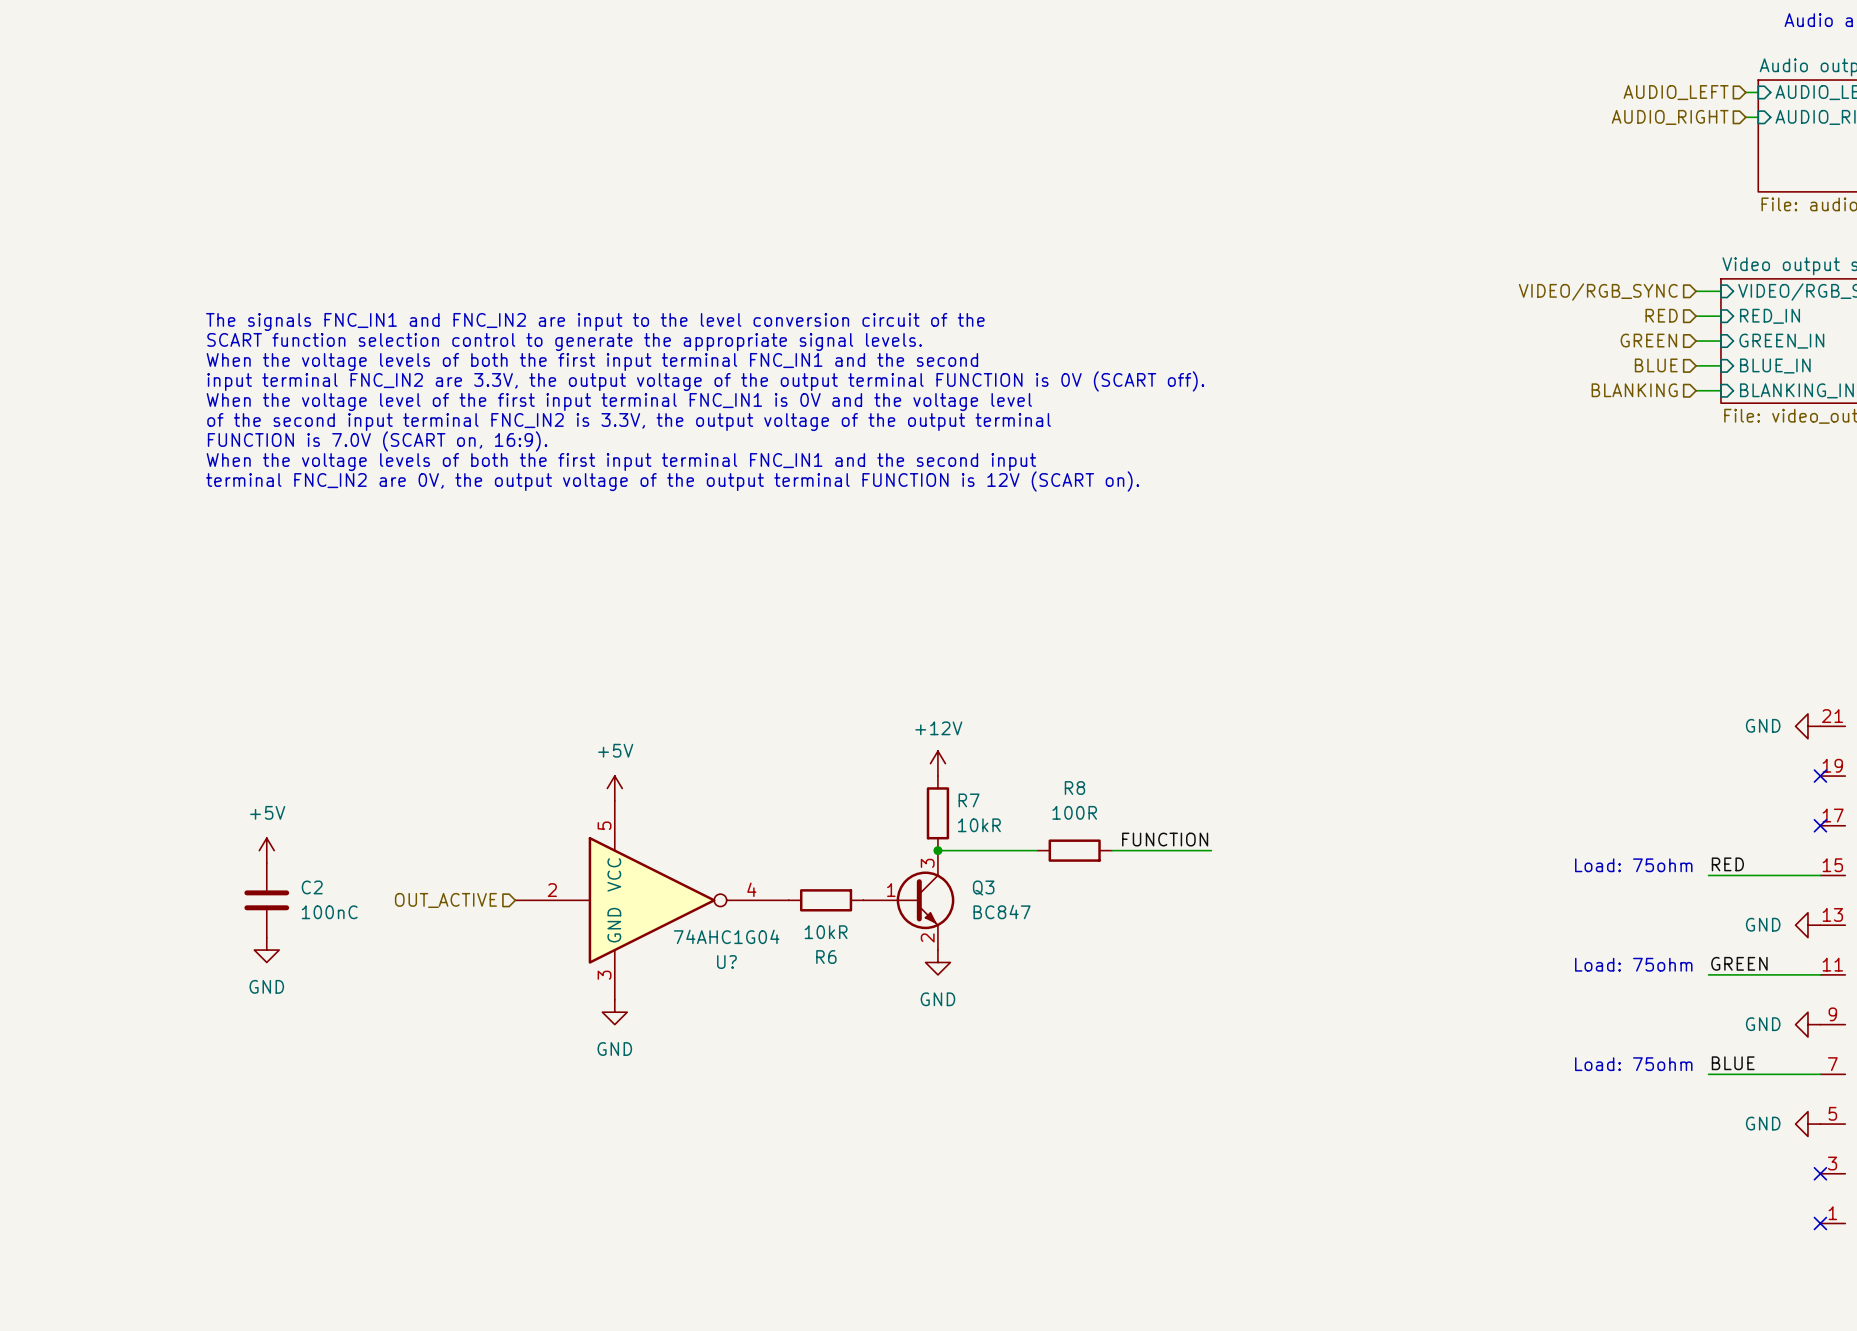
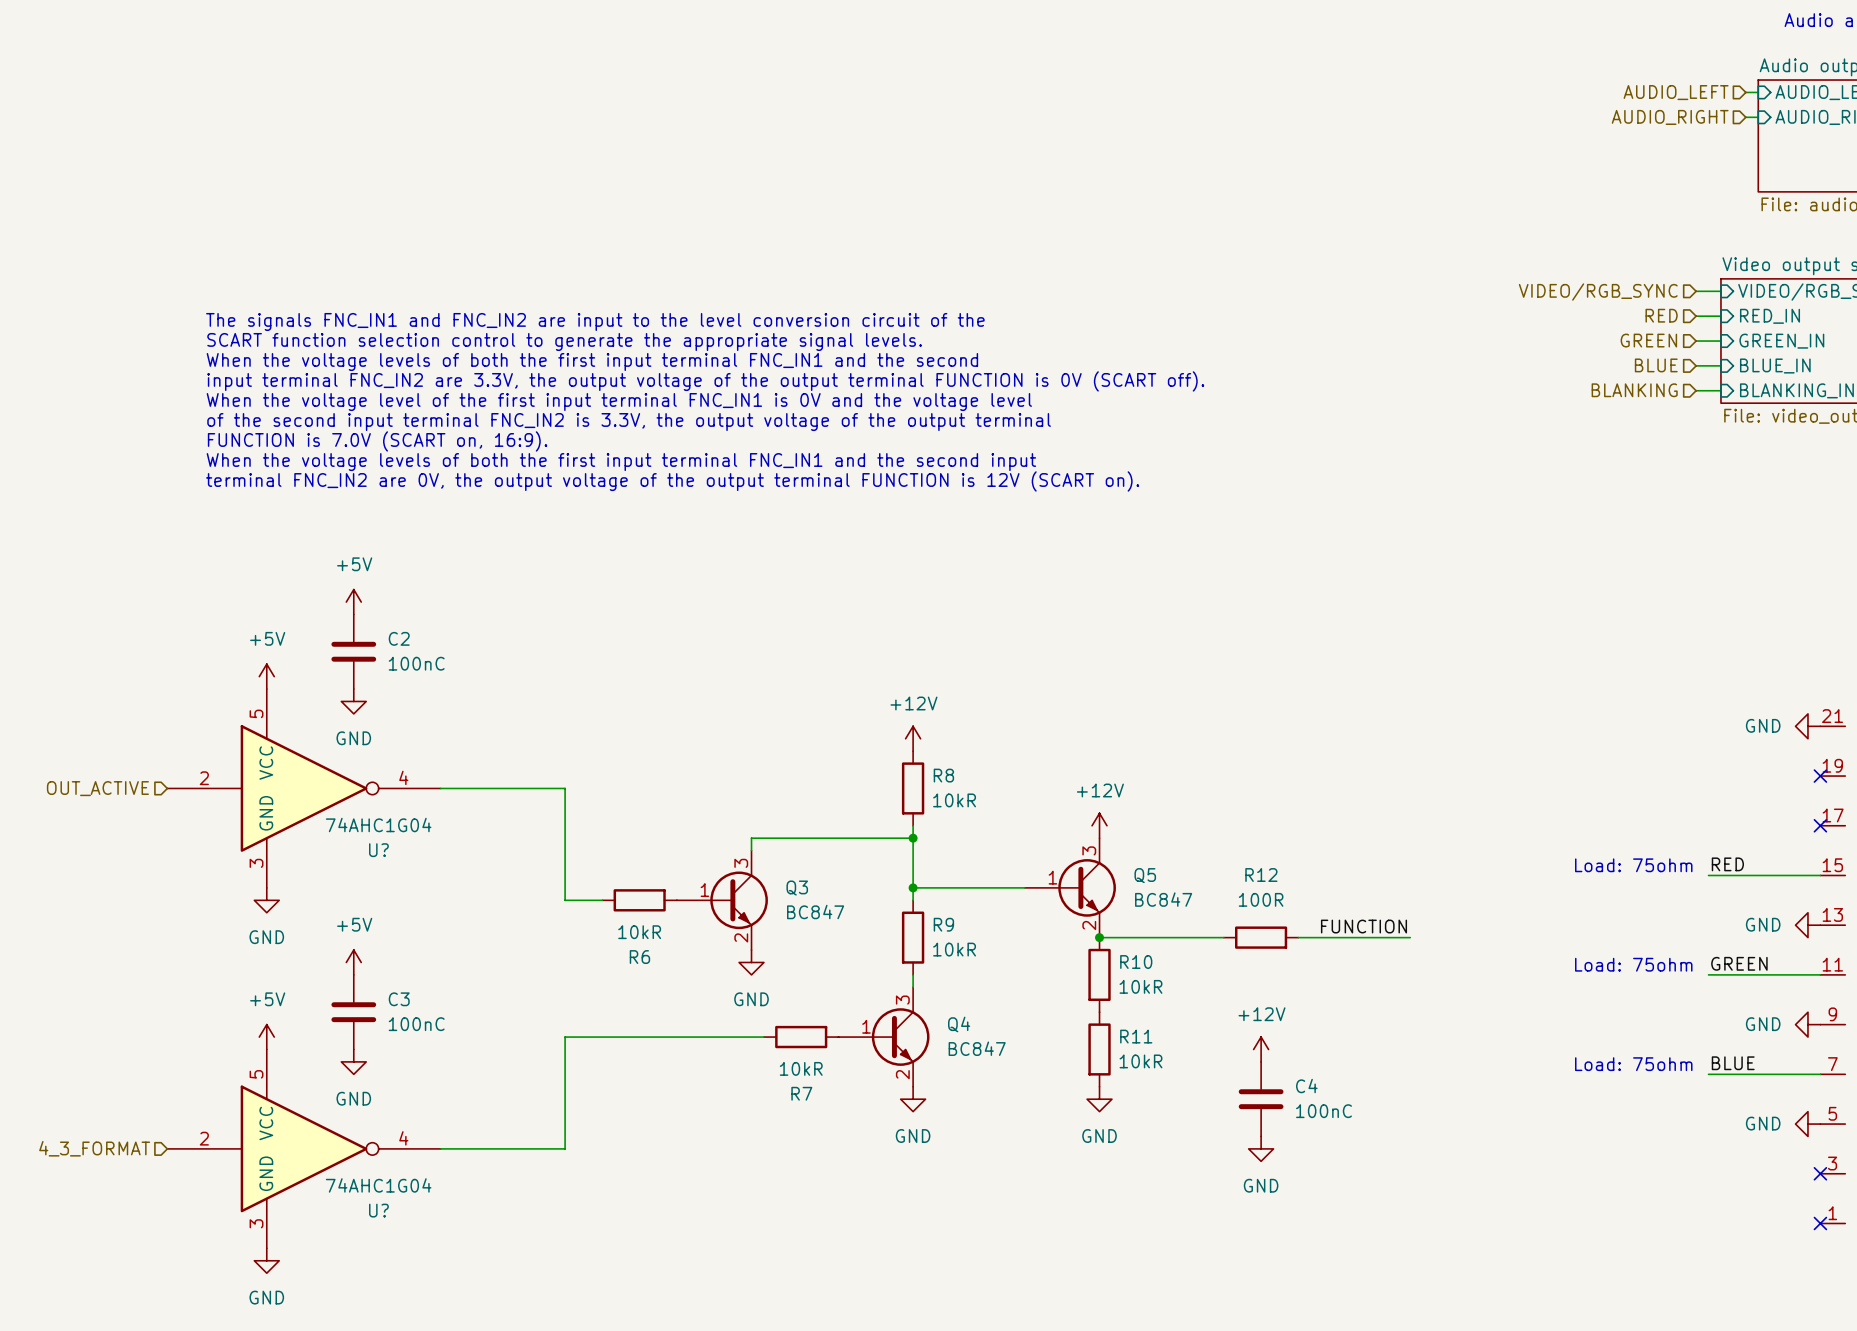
power symbol: none -> +5V (353, 602)
power symbol: none -> +5V (266, 676)
power symbol: none -> GND (353, 701)
power symbol position: +12V (937, 763) -> +12V (913, 738)
hierarchical label: none -> OUT_ACTIVE (97, 788)
U?: none -> 74AHC1G04 (304, 788)
wire: none -> (440, 788) (565, 788) (565, 900) (602, 900)
power symbol: +5V (614, 788) -> none
R8 name position: R8 (1074, 788) -> R8 (943, 775)
R7 name position: R7 (969, 800) -> R7 (801, 1093)
R8 value: 100R (1074, 812) -> 10kR (954, 800)
R7 rotation: 0° (937, 813) -> 90° clockwise (801, 1037)
R7 position: (937, 813) -> (801, 1037)
wire: none -> (913, 825) (913, 900)
power symbol: none -> +12V (1099, 825)
wire: none -> (913, 838) (751, 838) (751, 850)
junction: none -> (913, 838)
label position: FUNCTION (1165, 839) -> FUNCTION (1363, 926)
power symbol: +5V (266, 850) -> none
wire: (937, 850) (1037, 850) -> none
junction: (937, 850) -> none
R8 rotation: 0° (1074, 850) -> 90° clockwise (913, 788)
R8 position: (1074, 850) -> (913, 788)
wire: (1111, 850) (1211, 850) -> none
wire: none -> (913, 887) (1024, 887)
junction: none -> (913, 887)
Q5: none -> BC847 (1070, 887)
C2 position: (266, 900) -> (353, 651)
hierarchical label: OUT_ACTIVE (445, 900) -> none
U?: 74AHC1G04 (652, 900) -> none
R6 position: (826, 900) -> (639, 900)
Q3 position: (908, 900) -> (722, 900)
R9: none -> 10kR (913, 937)
wire: none -> (1099, 937) (1223, 937)
junction: none -> (1099, 937)
R12: none -> 100R (1261, 937)
wire: none -> (1298, 937) (1410, 937)
power symbol position: GND (266, 950) -> GND (266, 900)
power symbol: none -> +5V (353, 962)
power symbol: none -> GND (751, 962)
power symbol: GND (937, 962) -> none
wire: none -> (913, 974) (913, 987)
R10: none -> 10kR (1099, 974)
C3: none -> 100nC (353, 1012)
power symbol: GND (614, 1012) -> none
power symbol: none -> +5V (266, 1037)
wire: none -> (763, 1037) (565, 1037) (565, 1148) (440, 1148)
Q4: none -> BC847 (884, 1037)
R11: none -> 10kR (1099, 1049)
power symbol: none -> +12V (1261, 1049)
power symbol: none -> GND (353, 1061)
power symbol: none -> GND (913, 1099)
power symbol: none -> GND (1099, 1099)
C4: none -> 100nC (1261, 1099)
hierarchical label: none -> 4_3_FORMAT (94, 1148)
U?: none -> 74AHC1G04 (304, 1148)
power symbol: none -> GND (1261, 1148)
power symbol: none -> GND (266, 1260)

